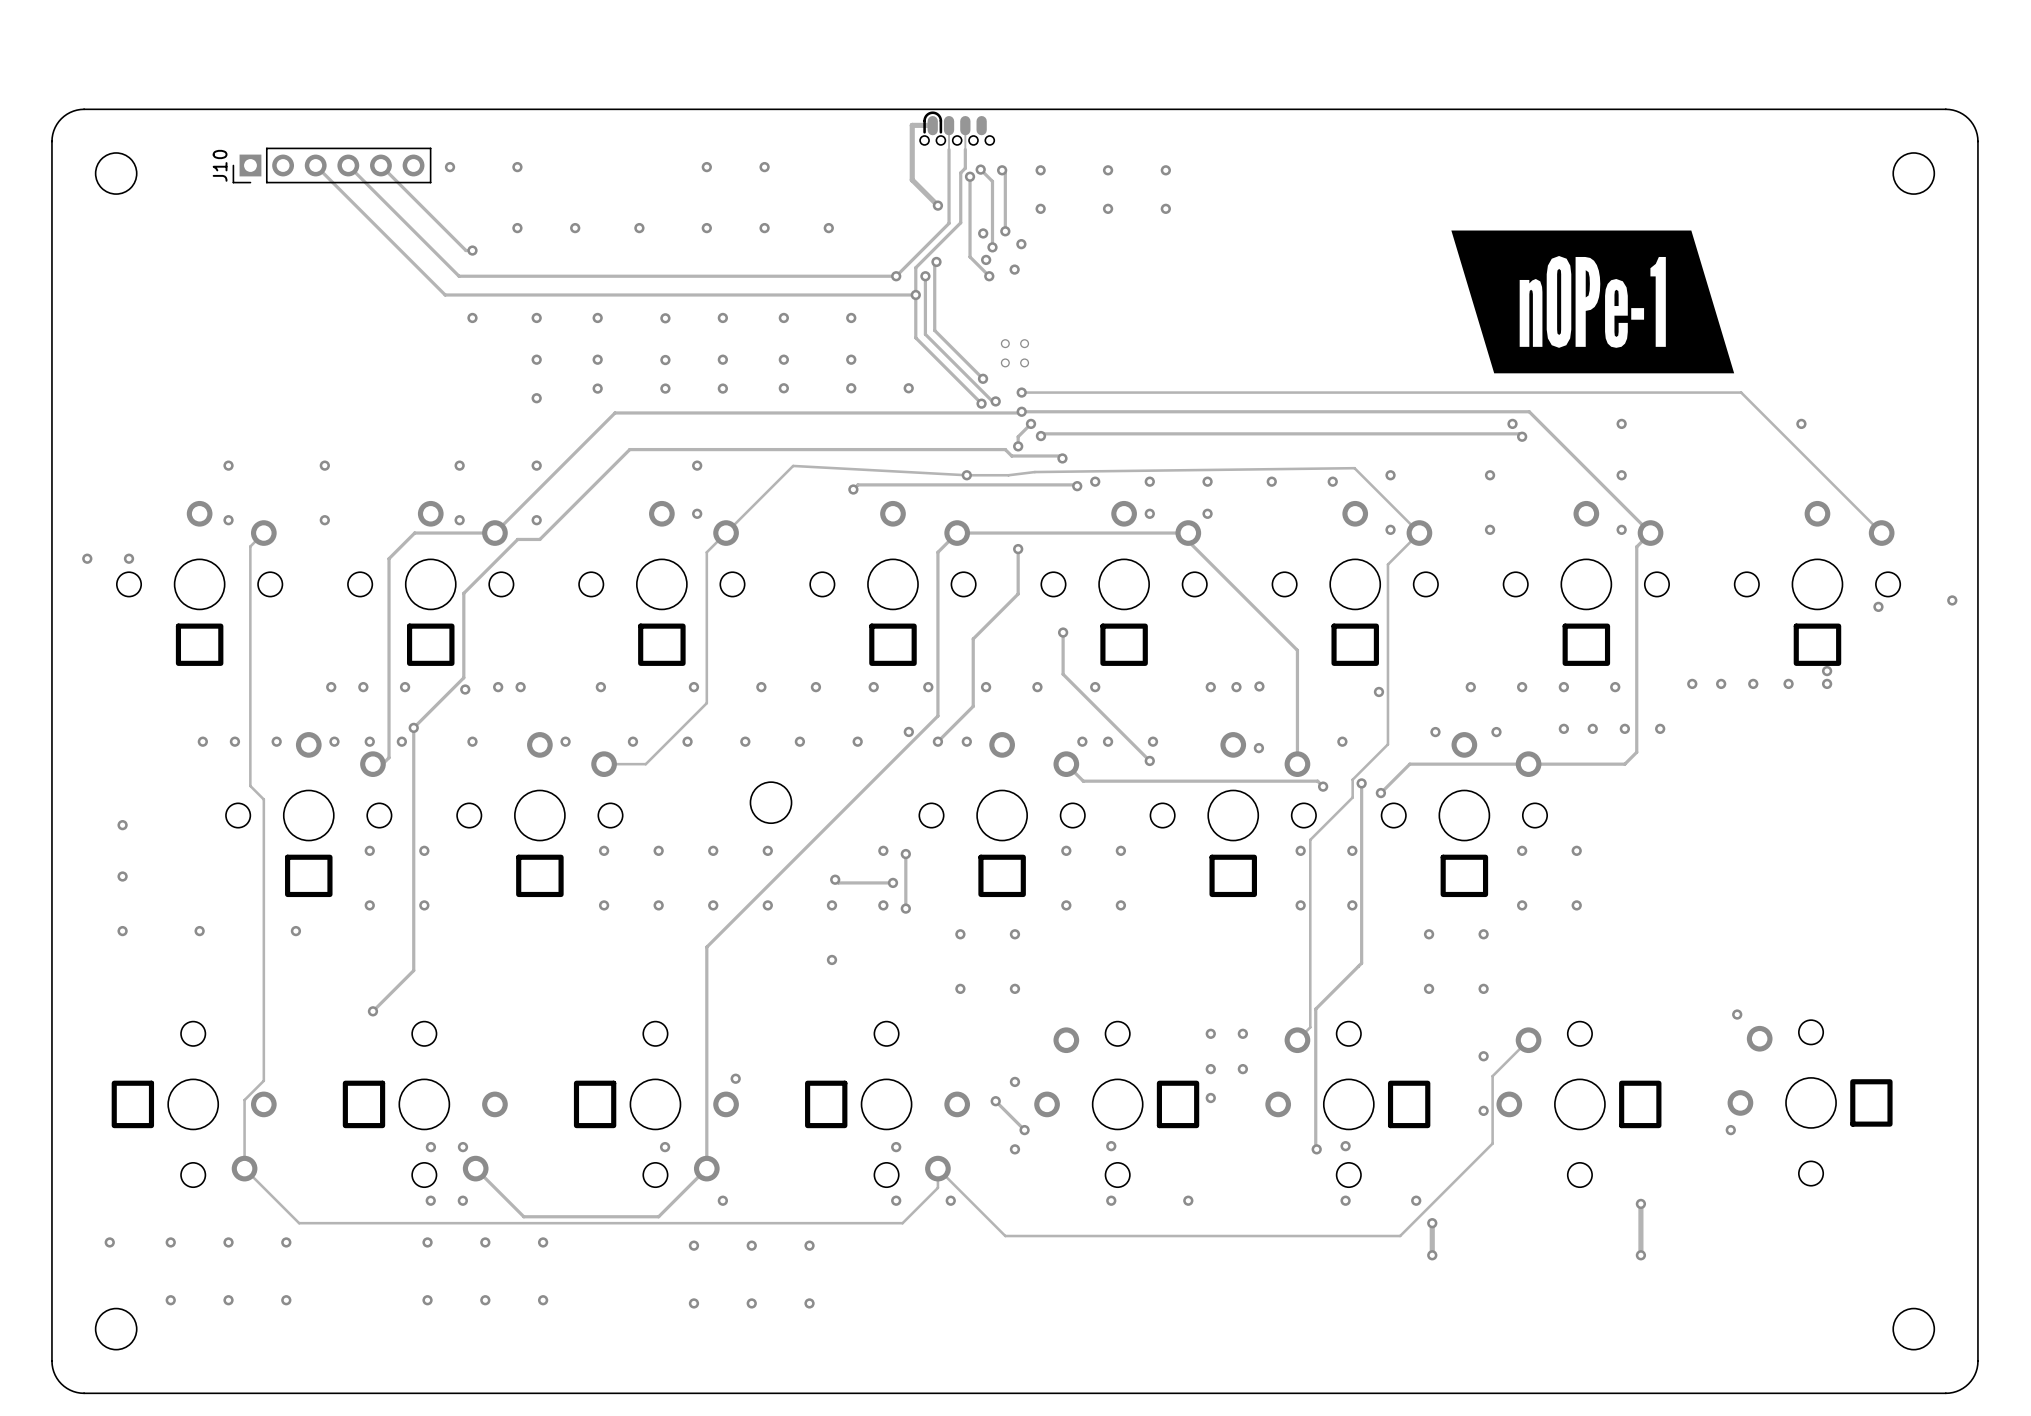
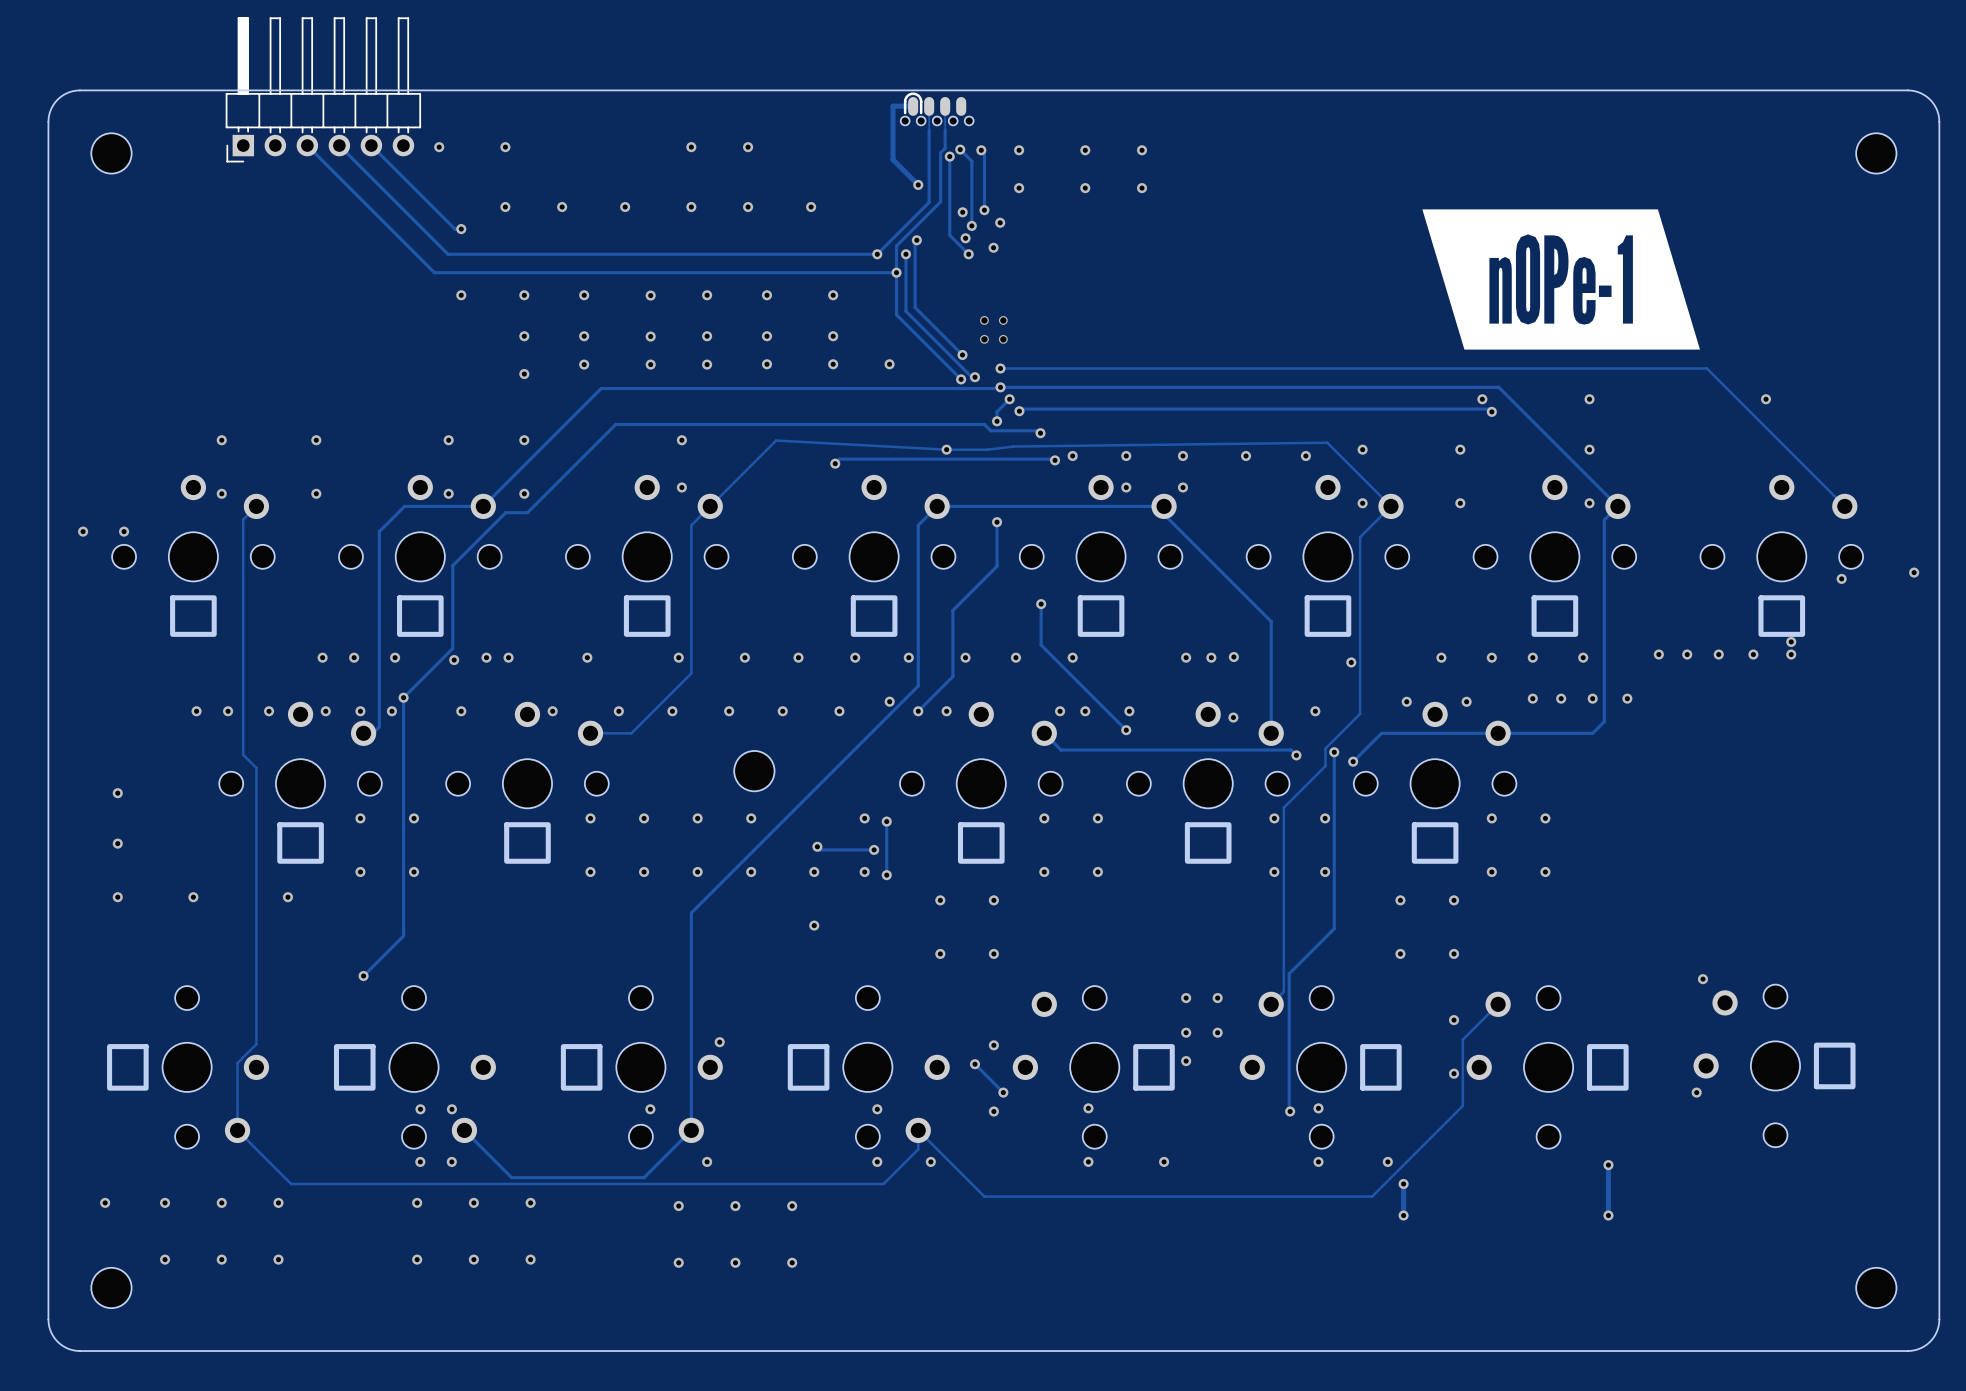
part: none -> (323, 89)
J10: (332, 165) -> none

